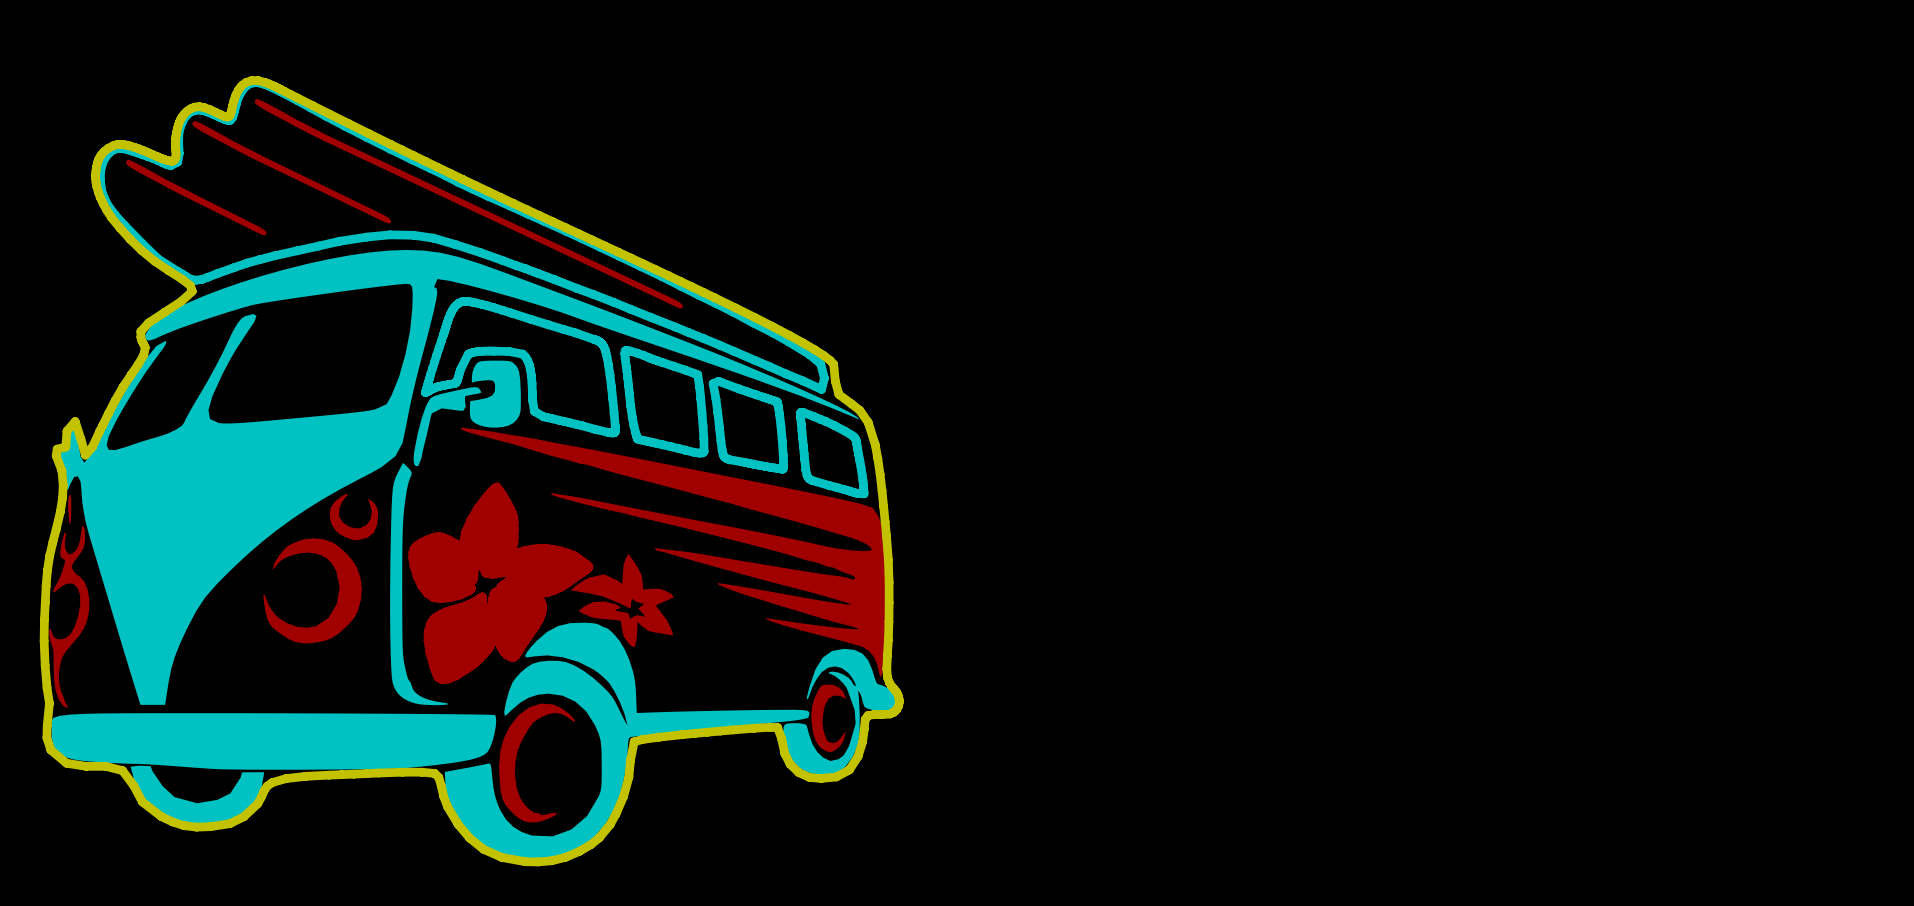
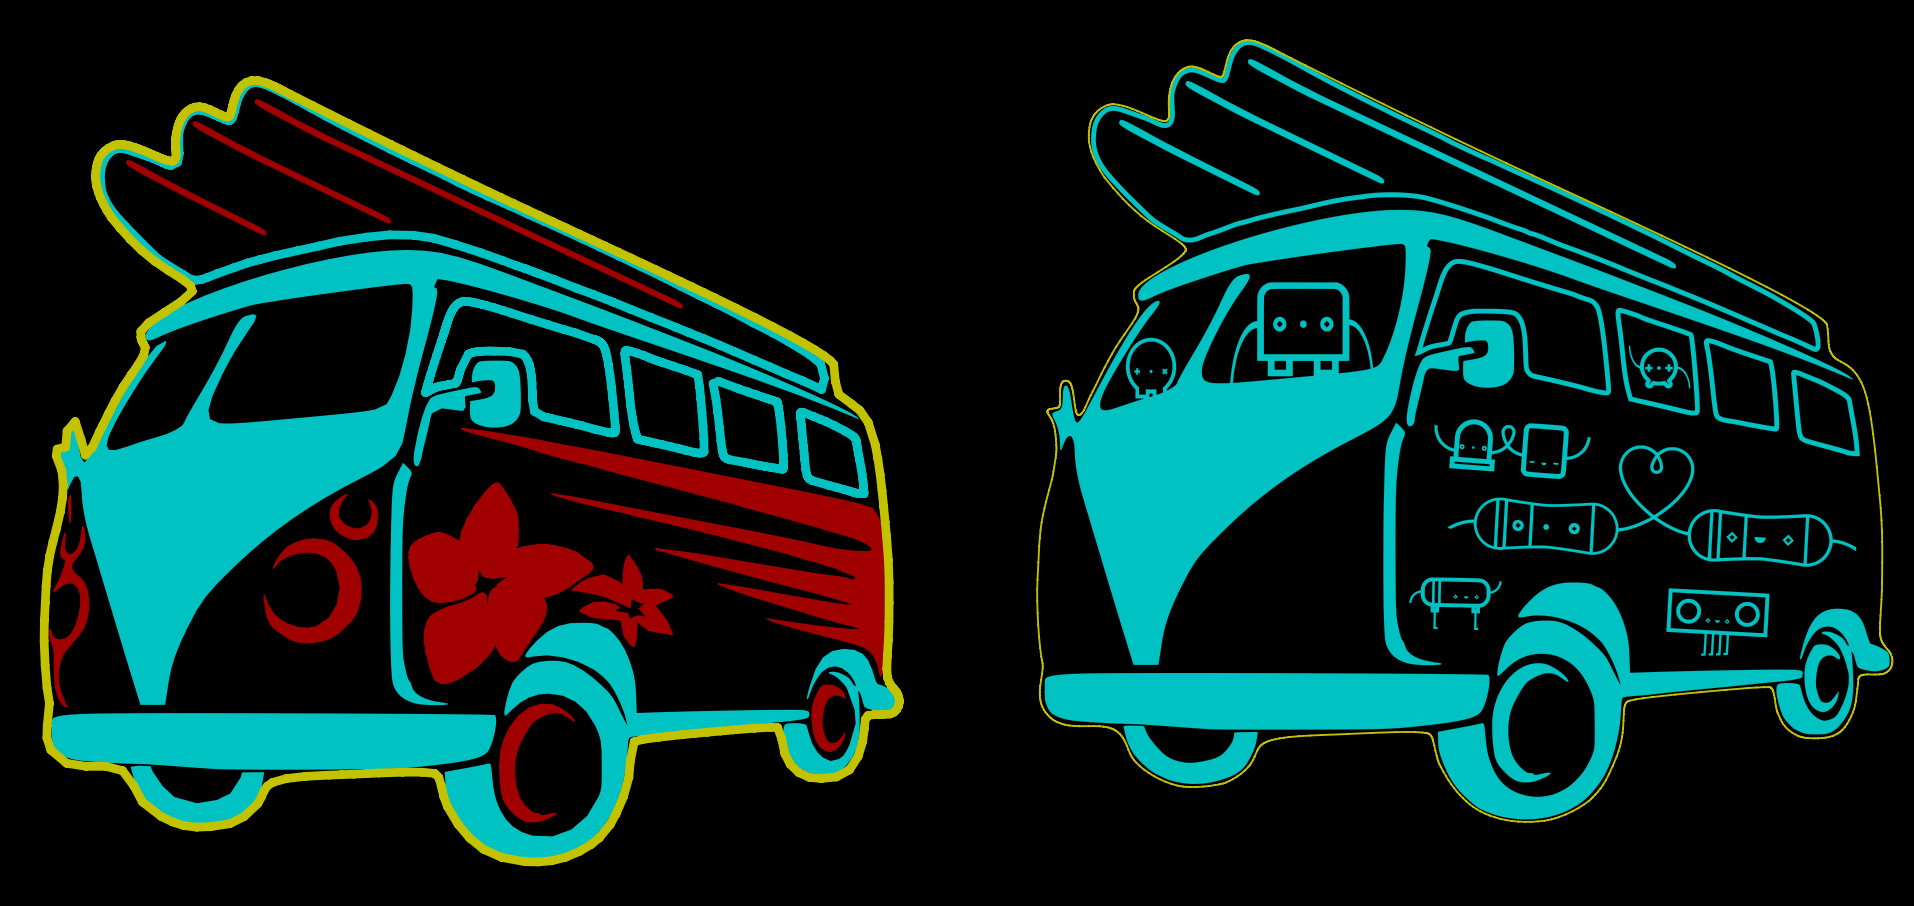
drawing: none -> [1036, 39, 1893, 823]

